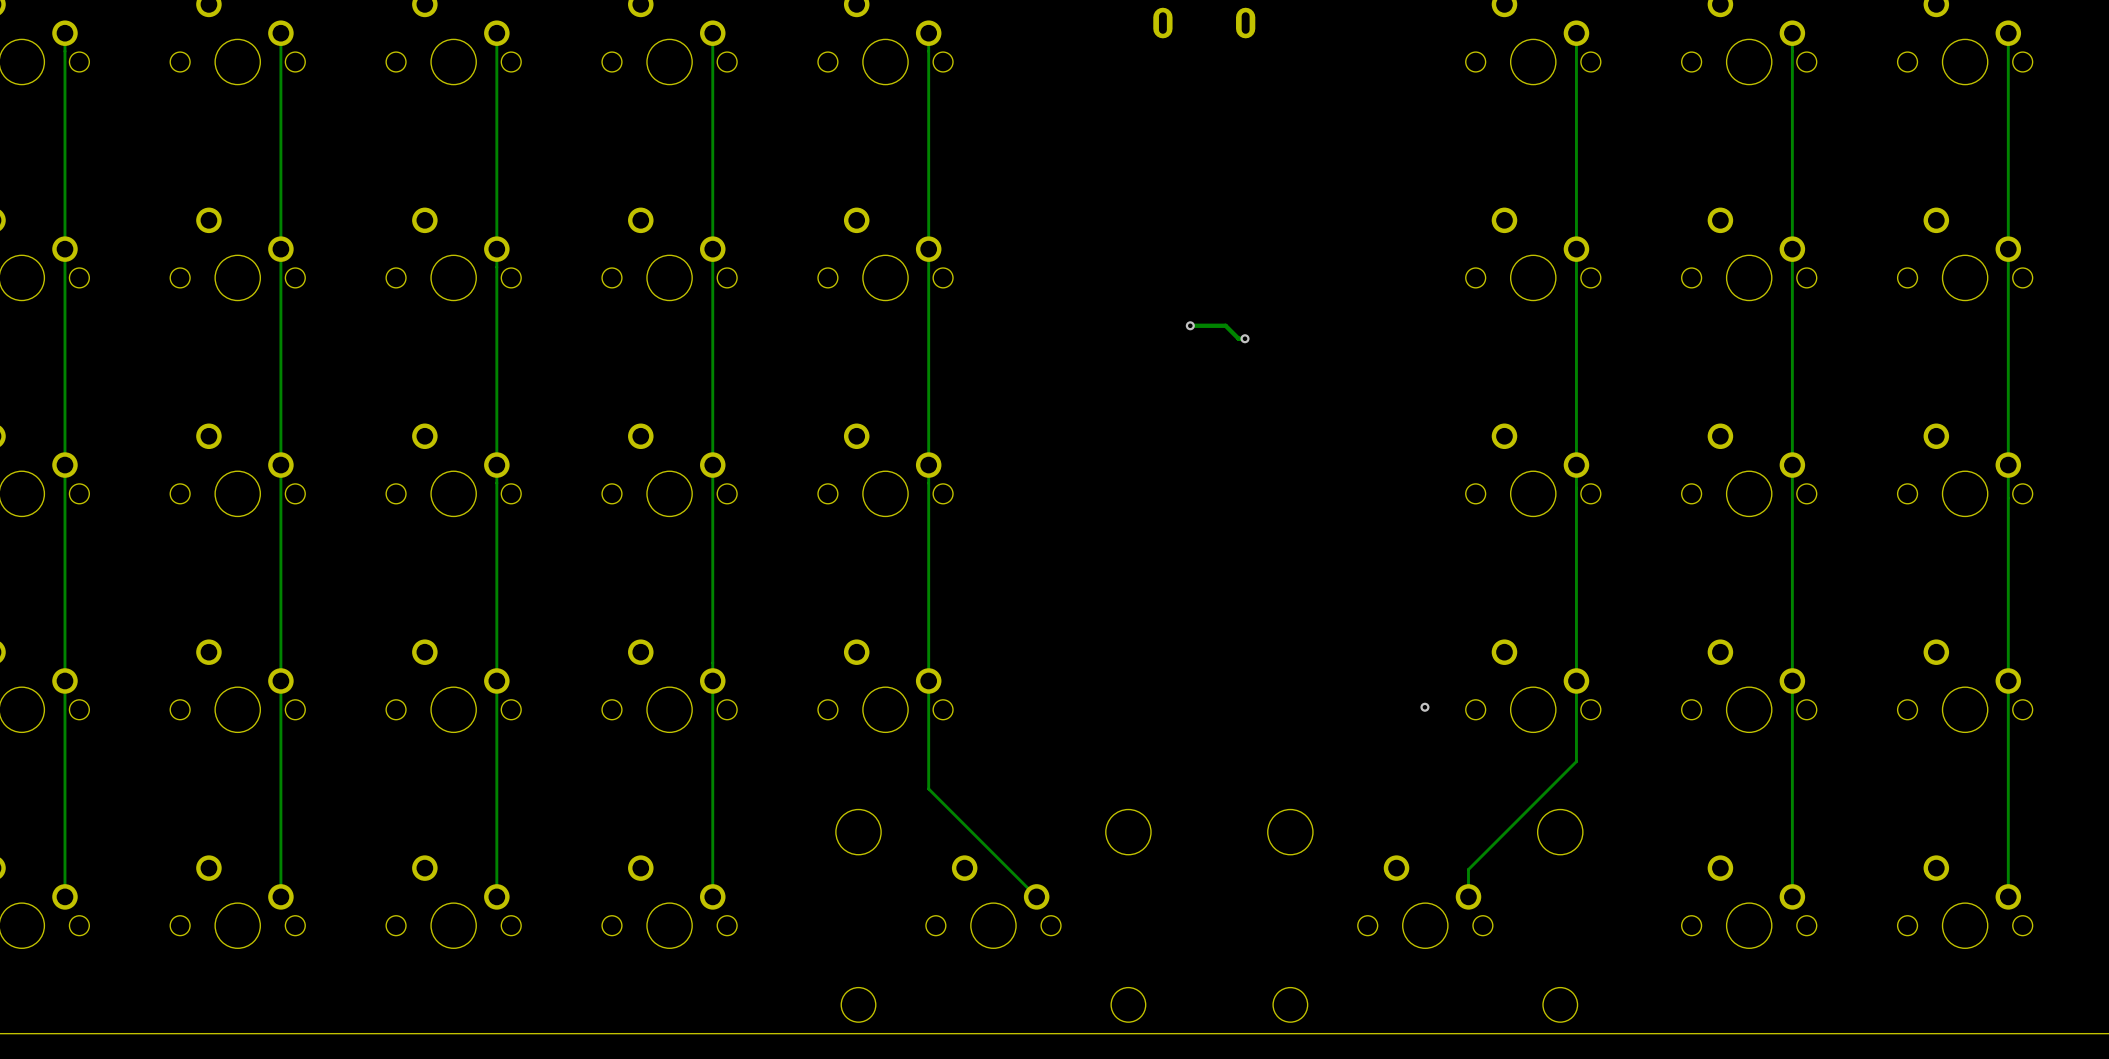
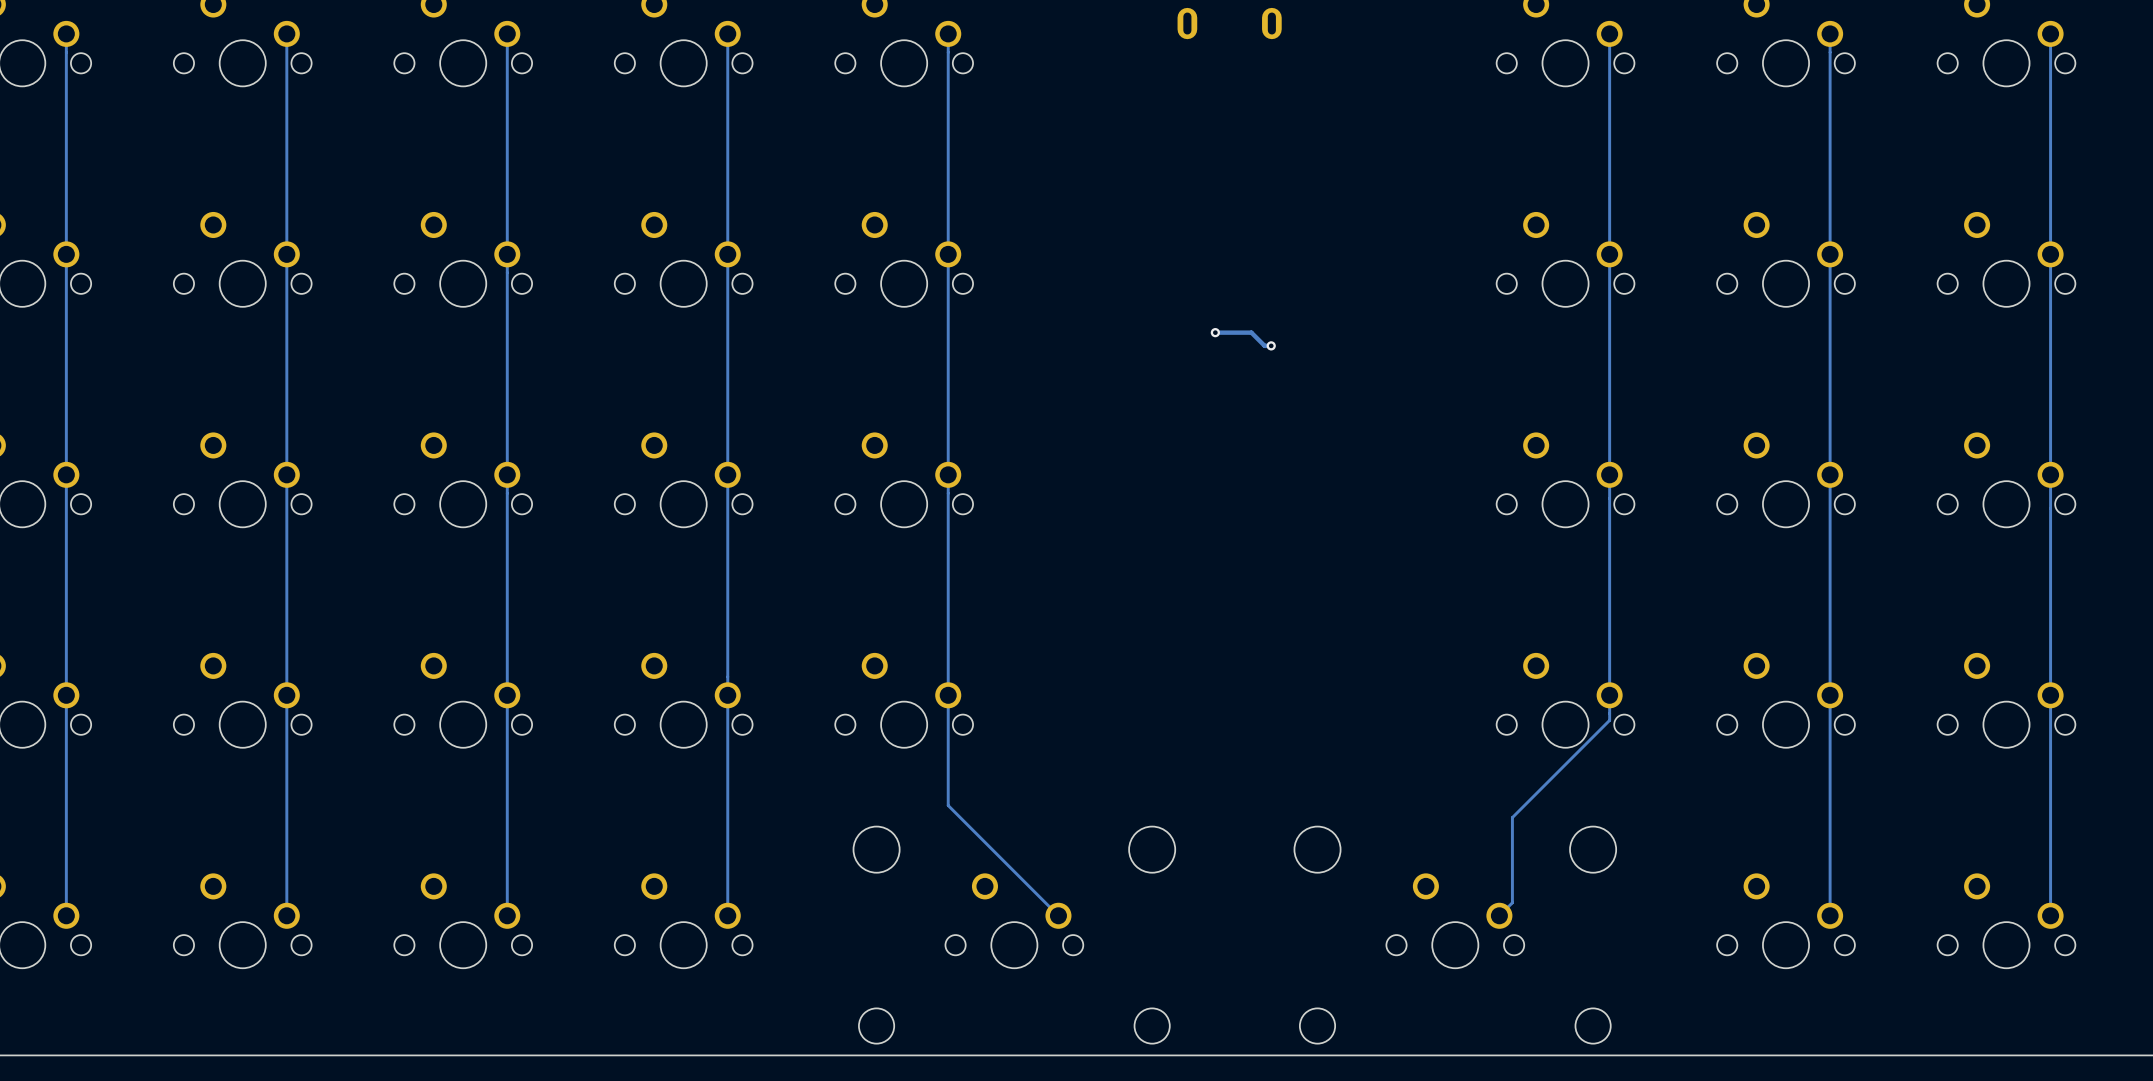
track: (1576, 705) (1576, 761) (1468, 869) (1468, 896) -> (1609, 720) (1512, 817) (1512, 902) (1499, 915)
via: (1424, 707) -> none

